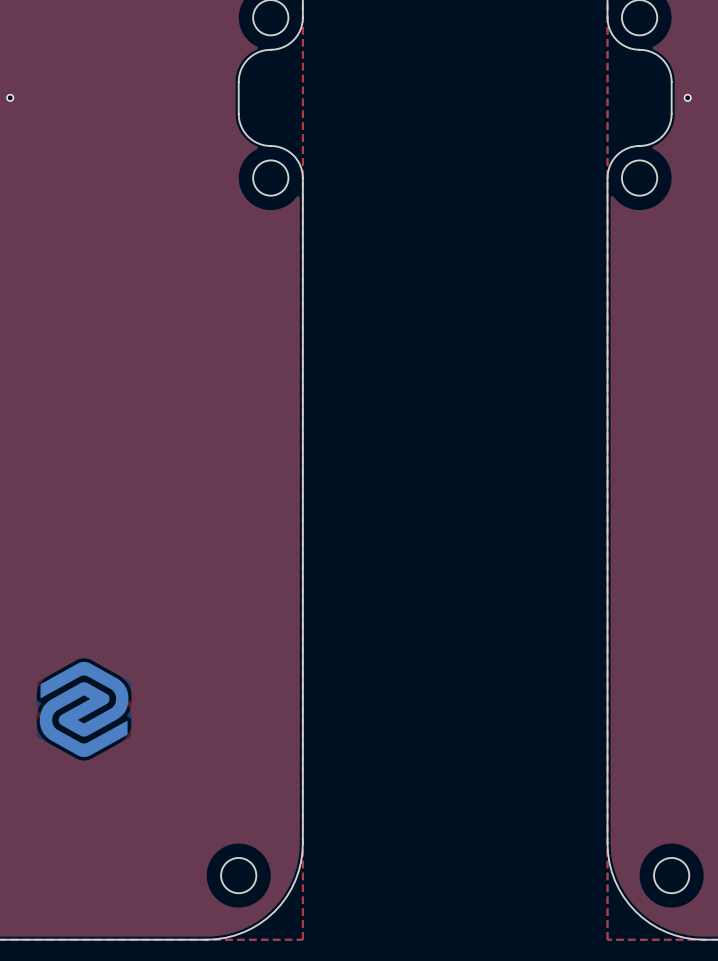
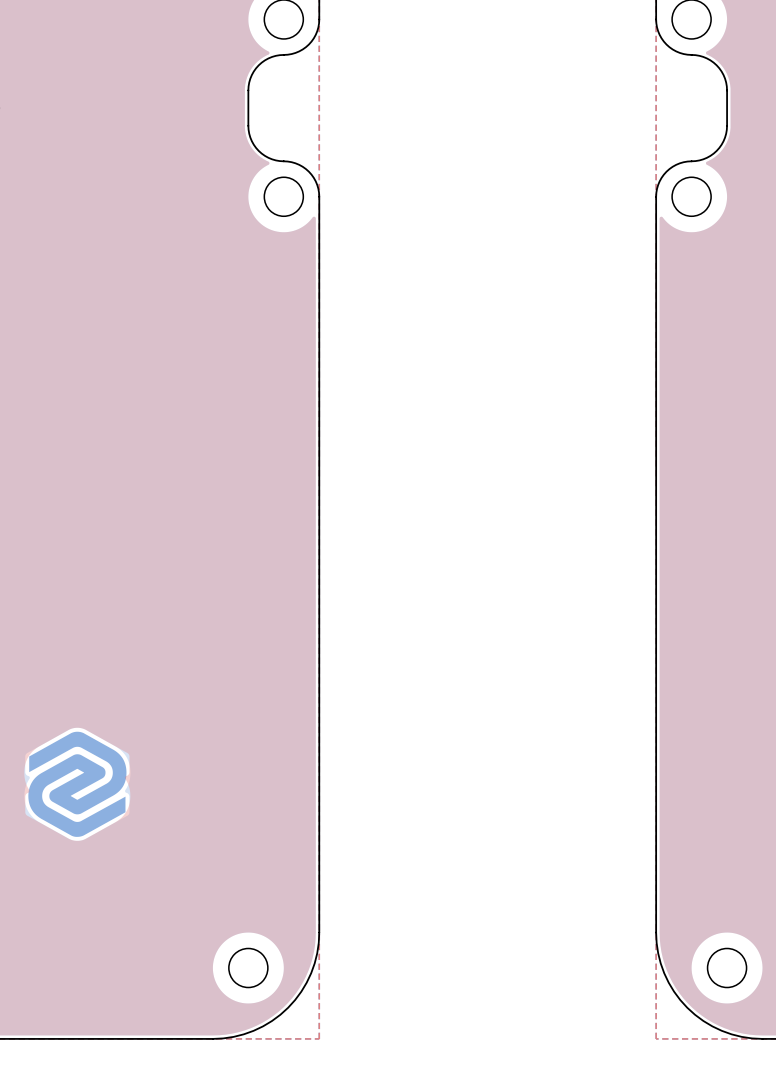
via: (687, 97) -> none

